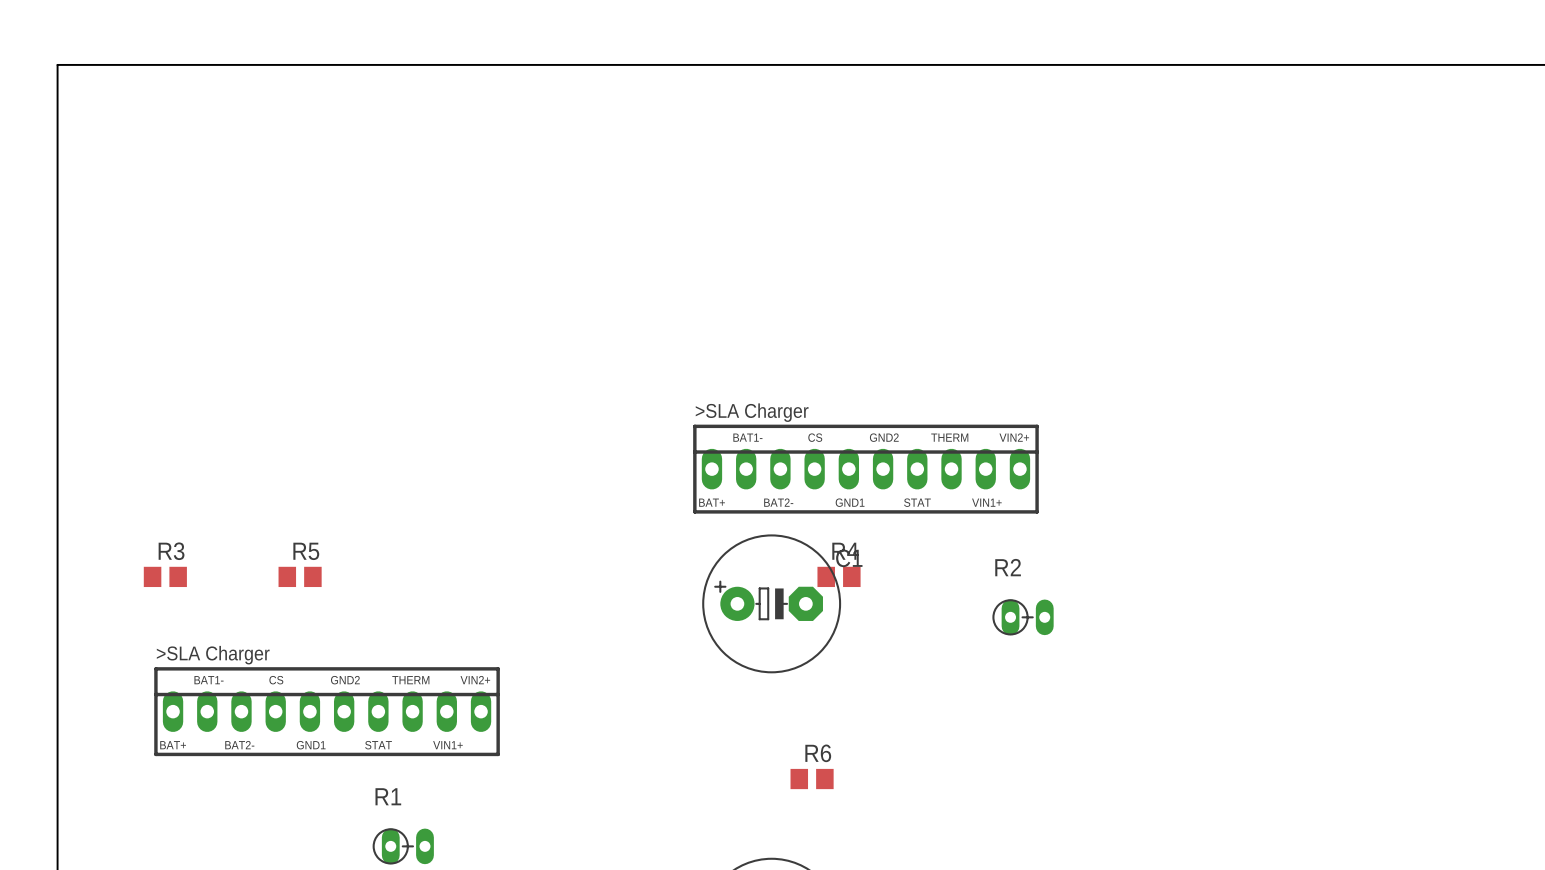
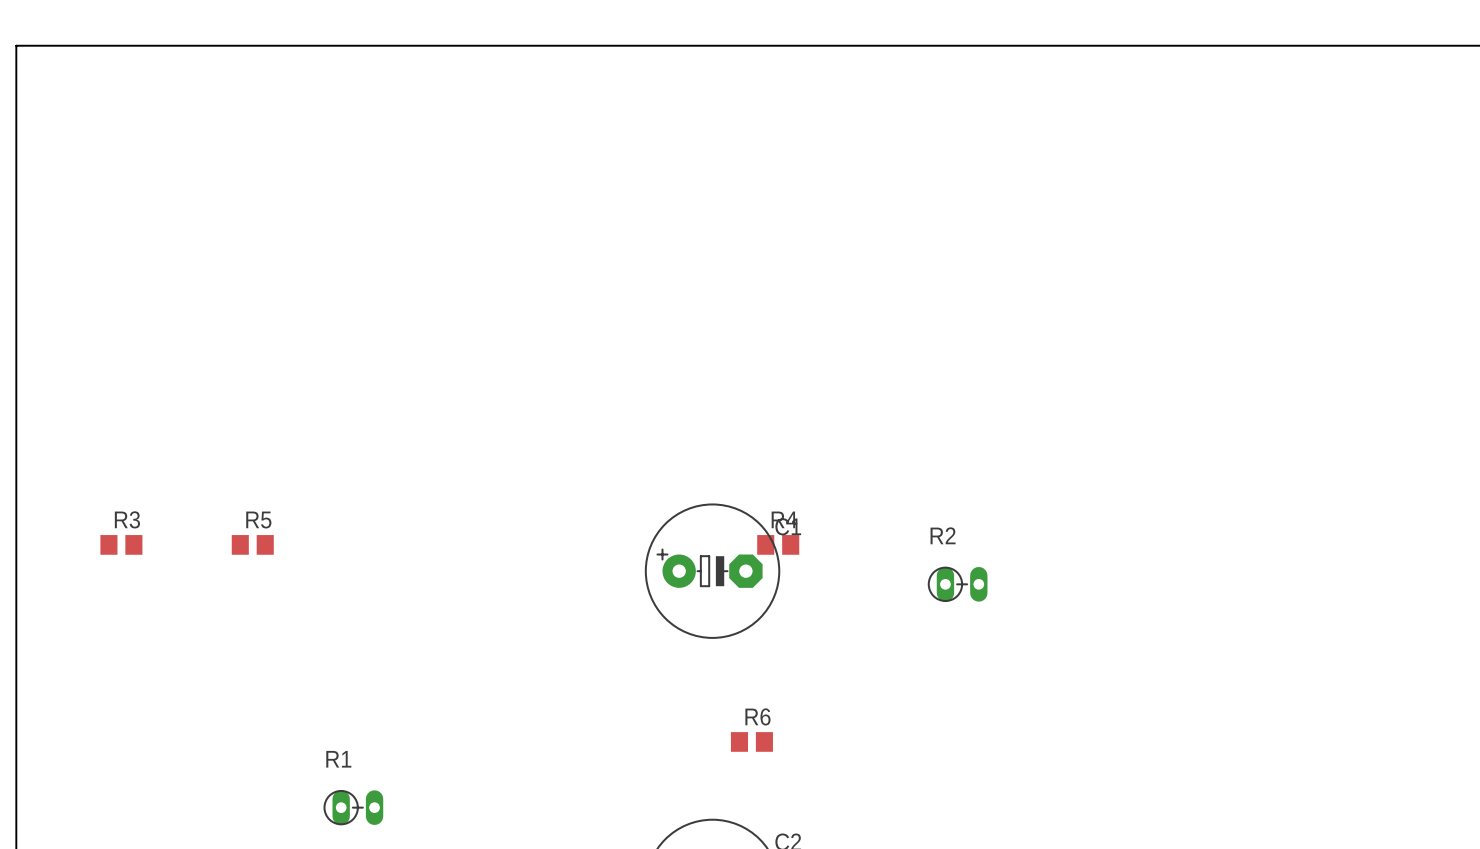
part: (865, 469) -> none
part: (327, 711) -> none

